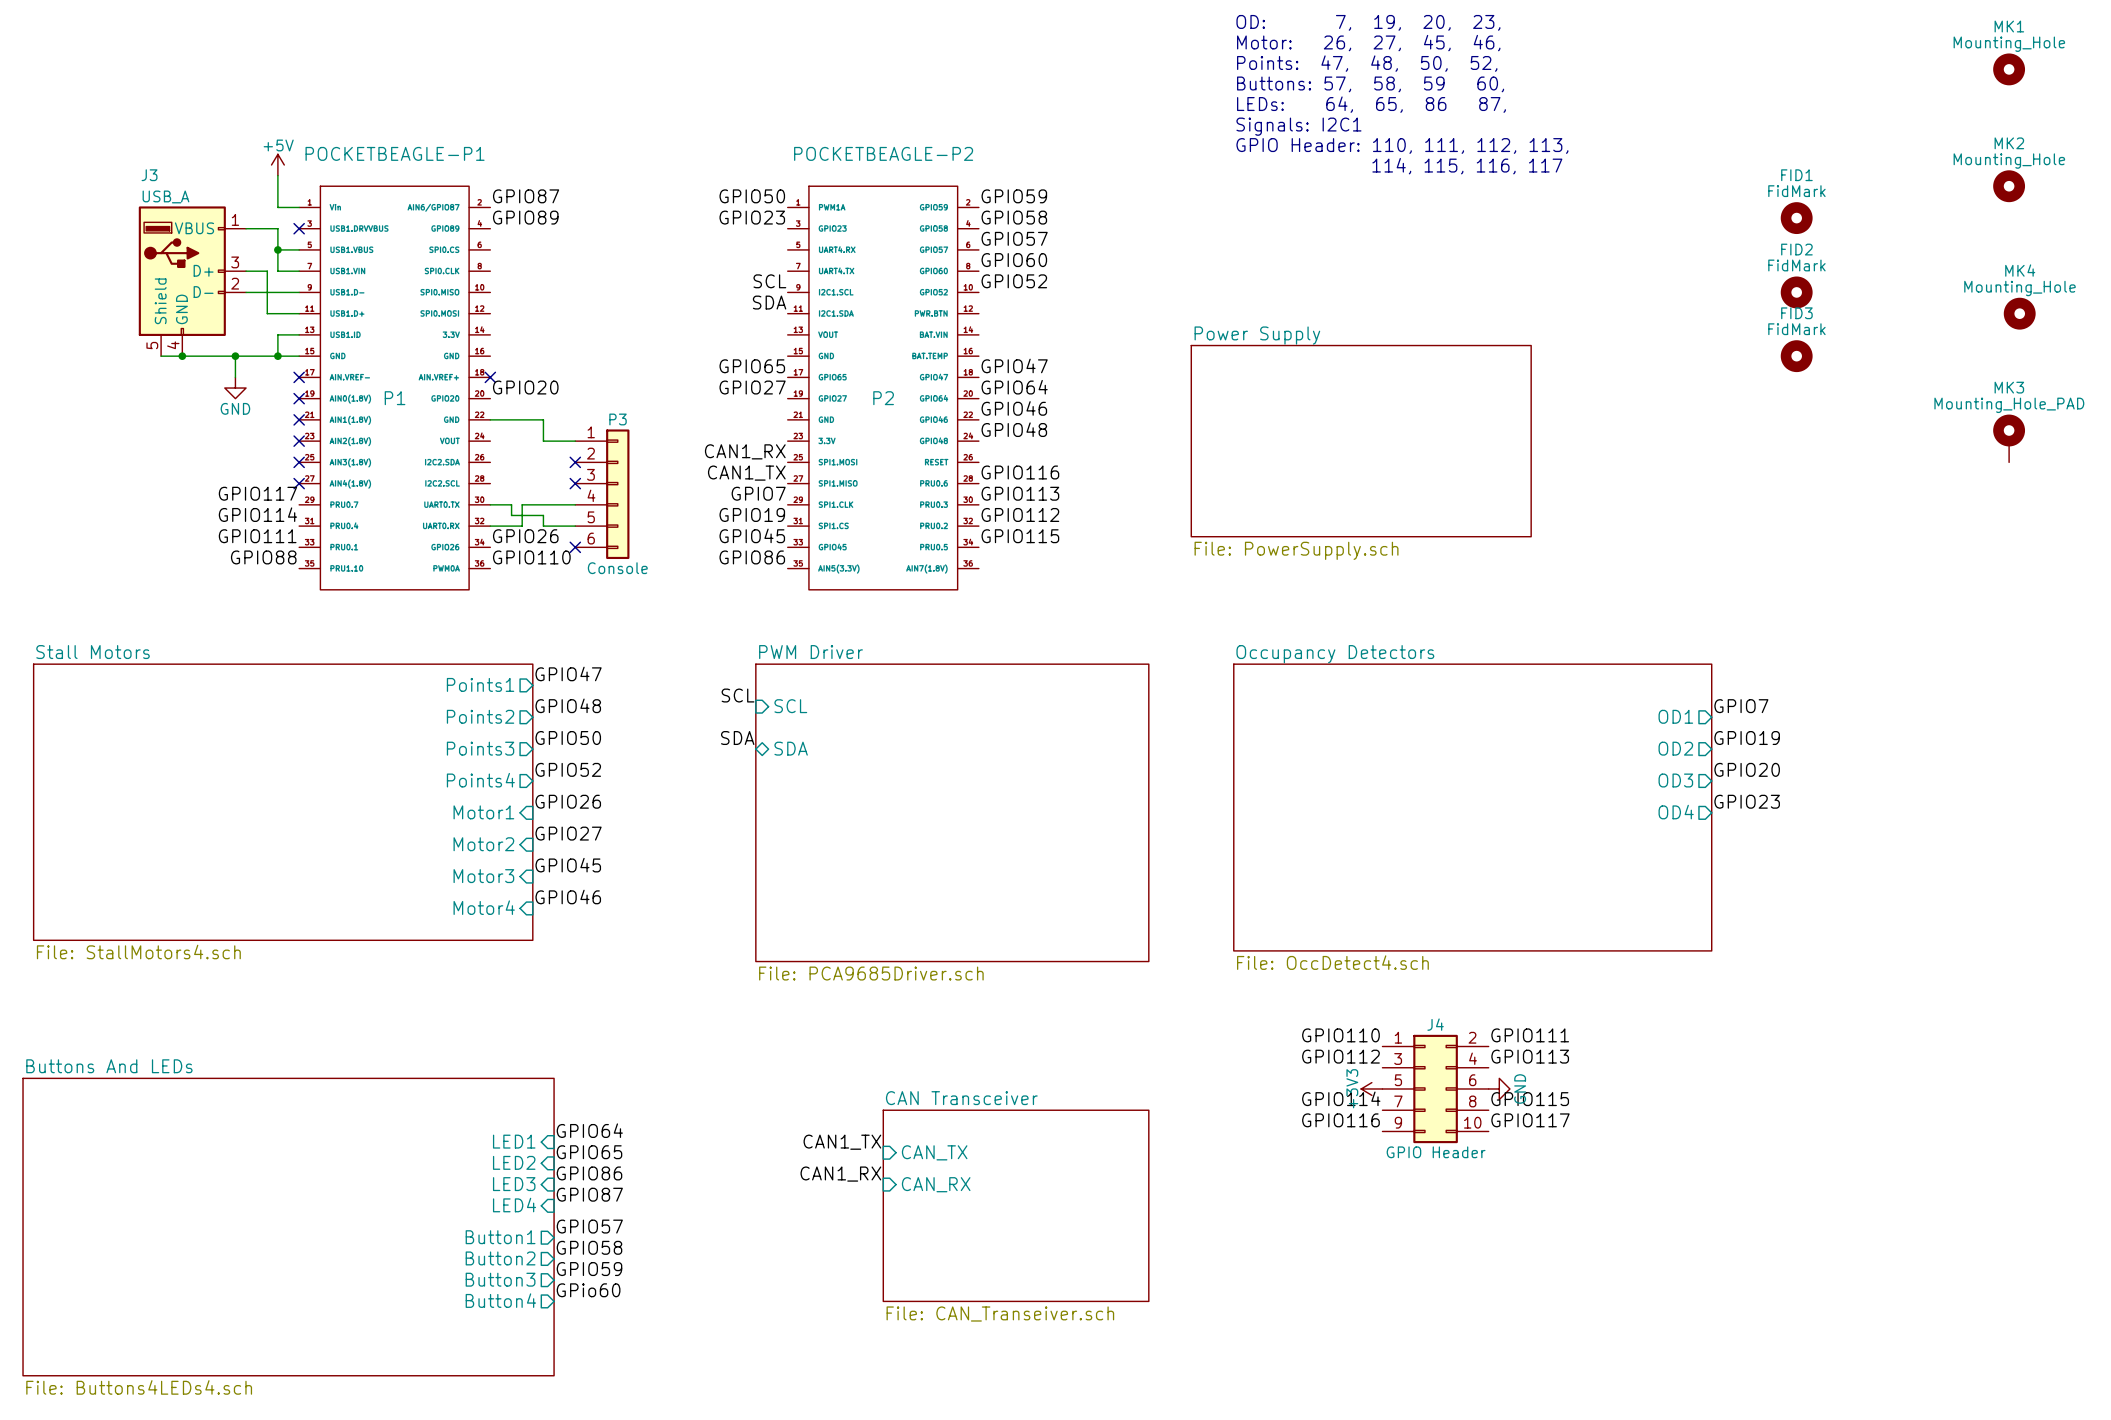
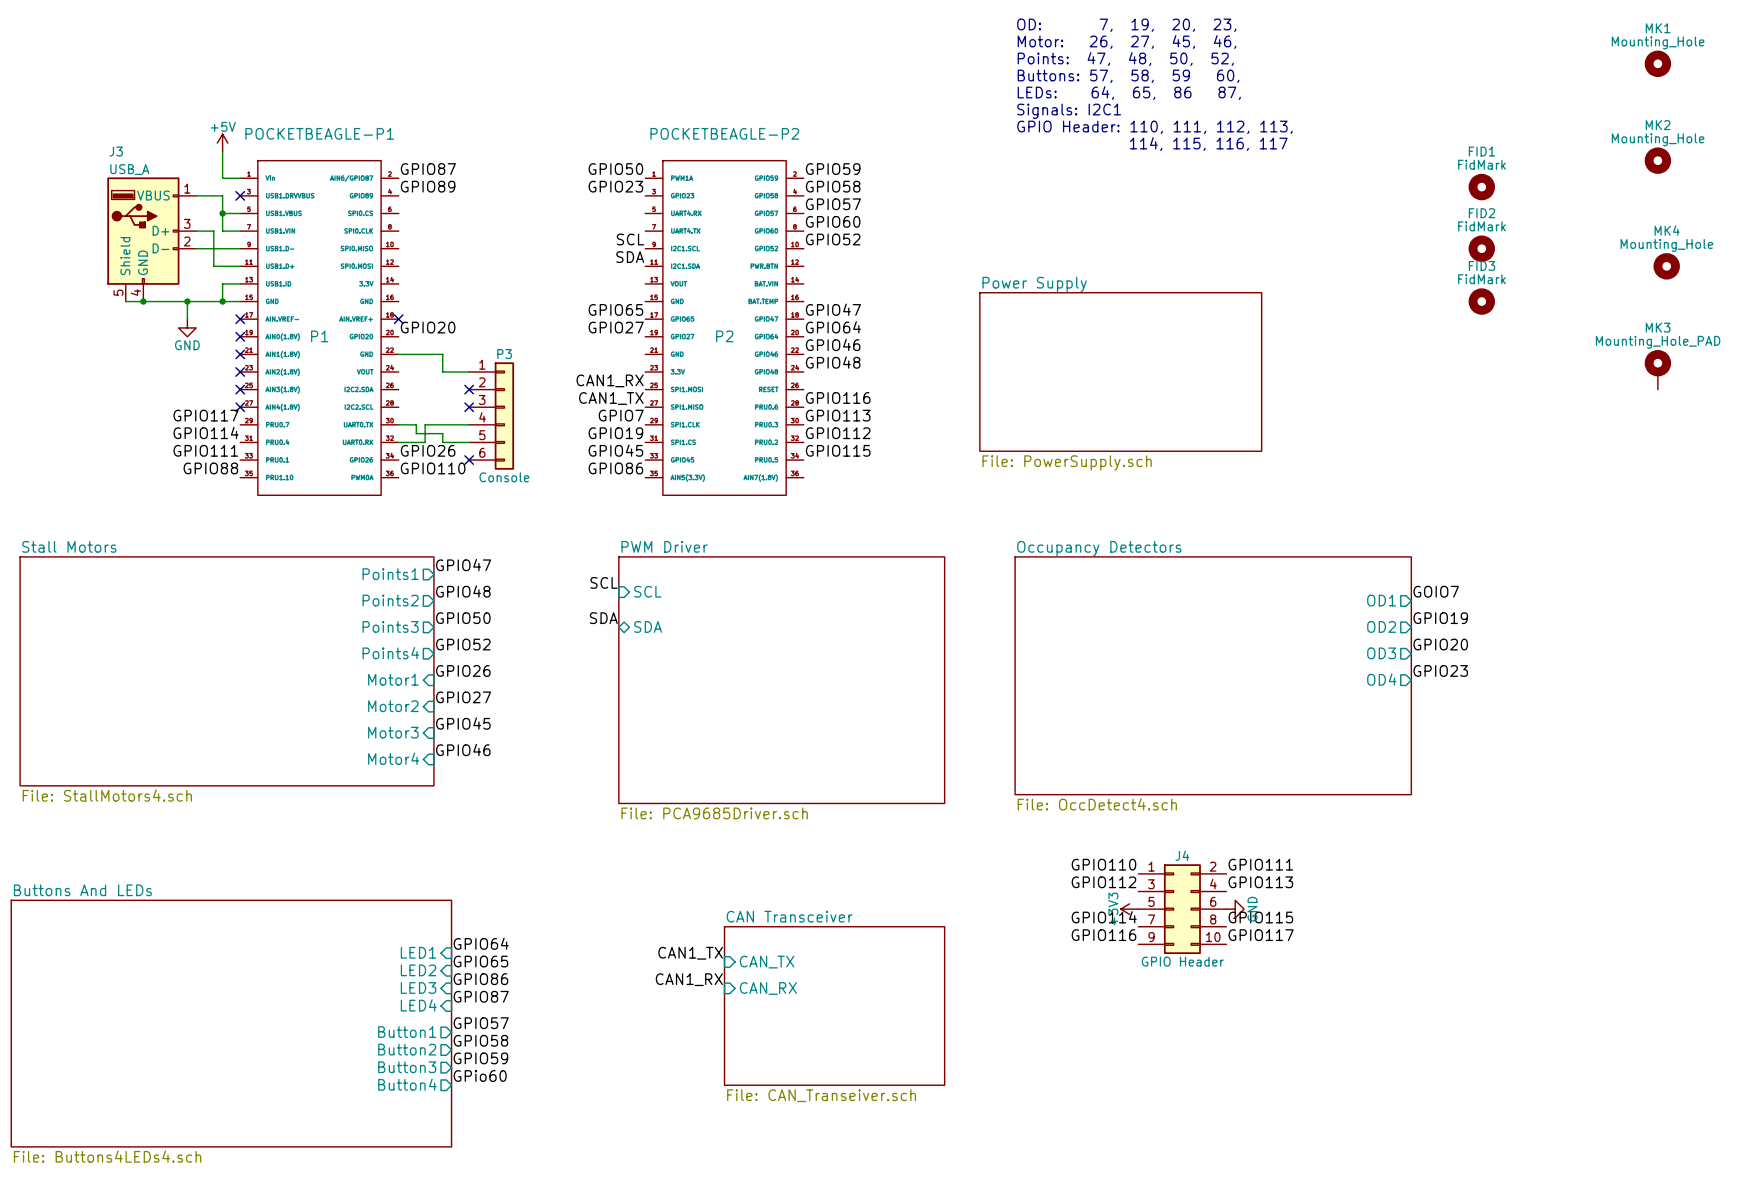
label: GPIO7 (1741, 706) -> GOIO7 (1436, 591)

